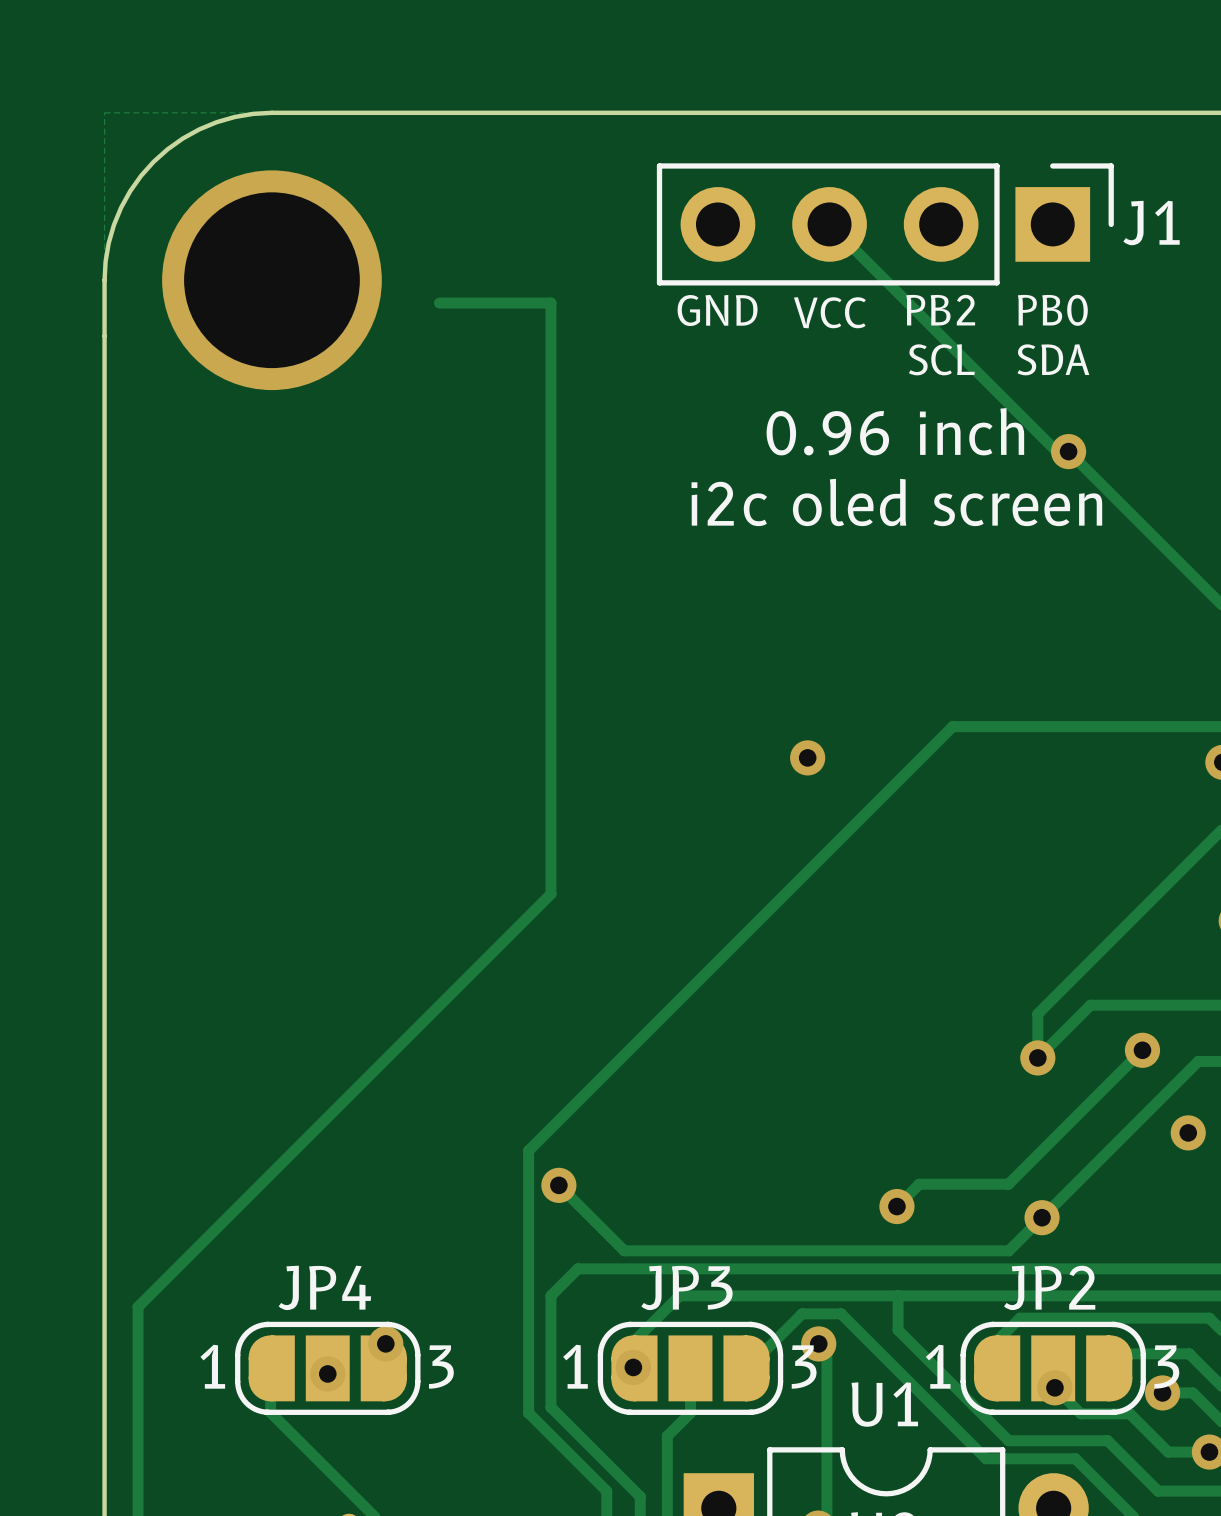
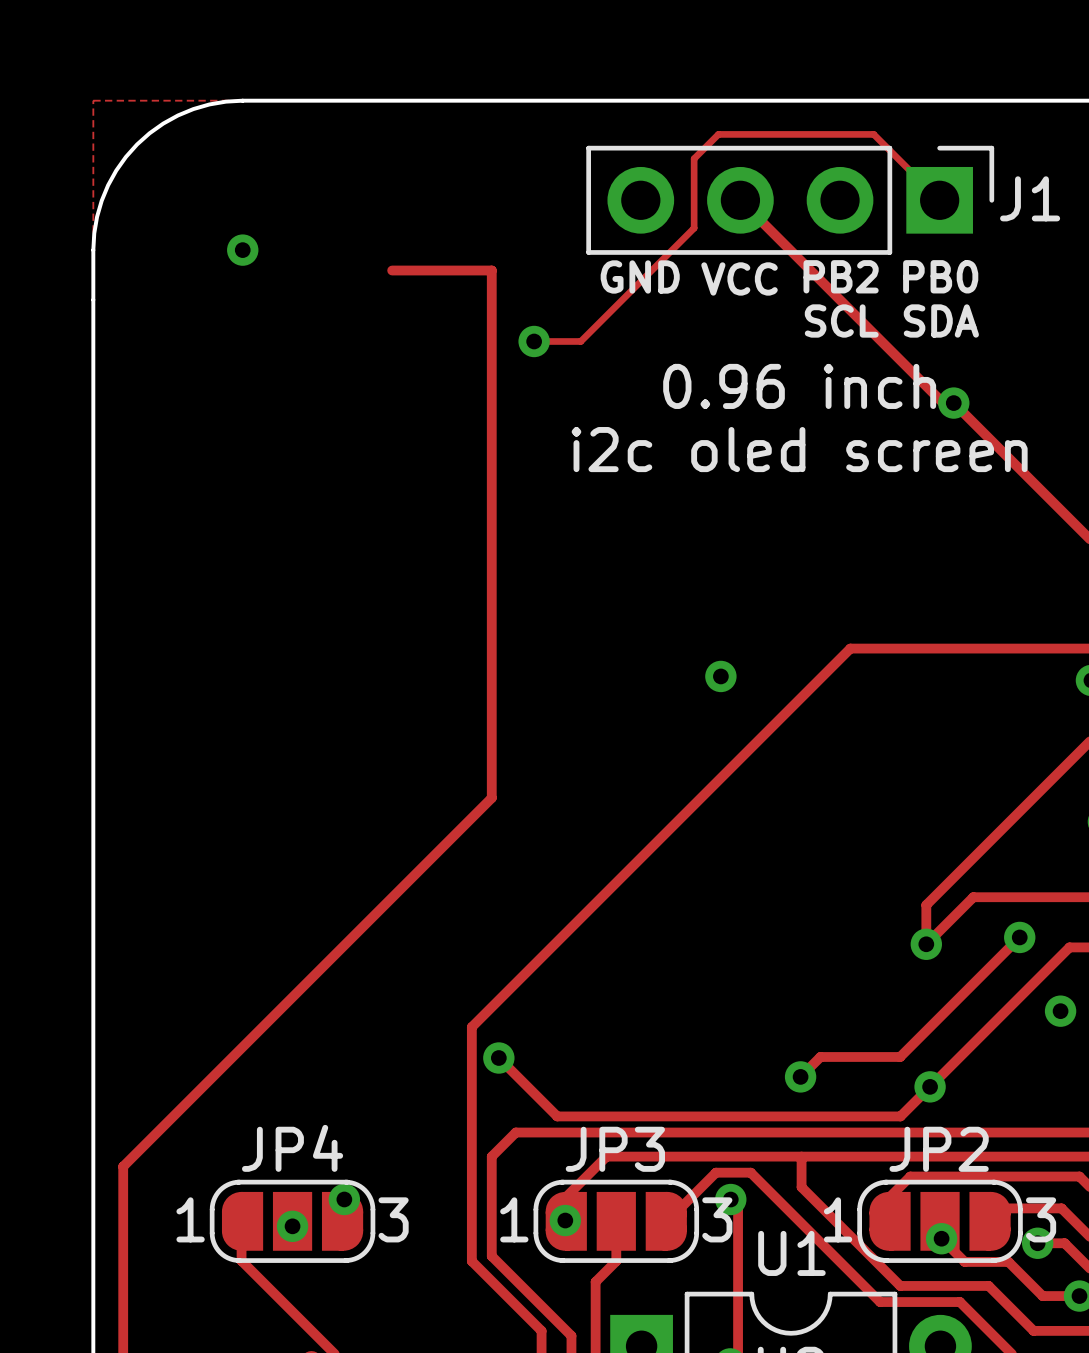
via size: [162, 170, 382, 391] -> [227, 234, 259, 266]
track: none -> (939, 200) (873, 134) (718, 134) (694, 158) (694, 228) (580, 341) (534, 341)
via: none -> (534, 341)

